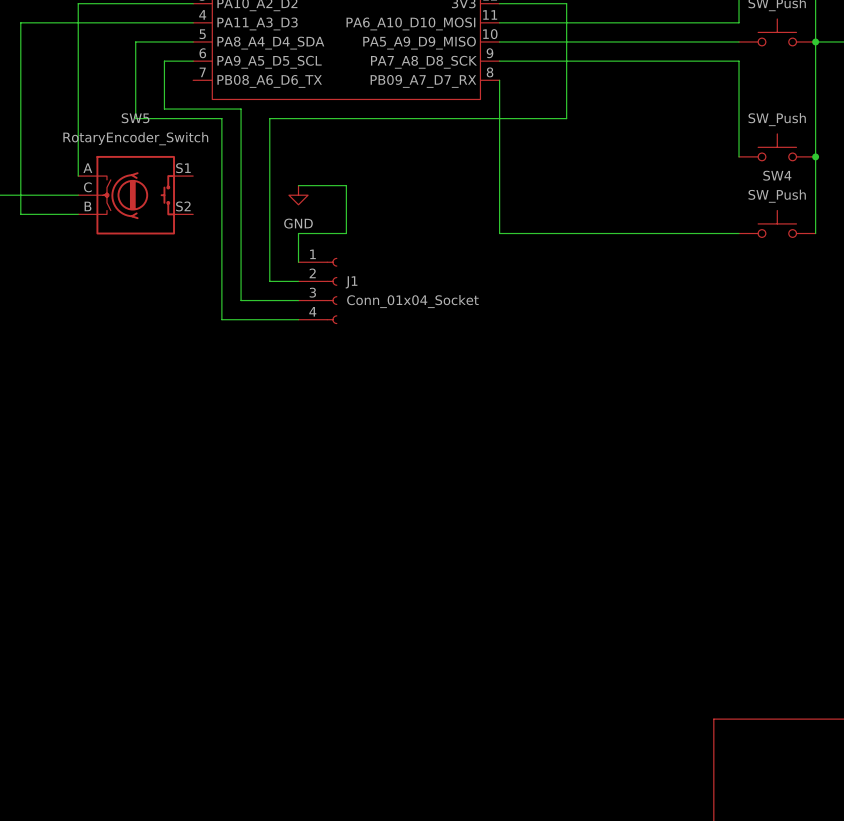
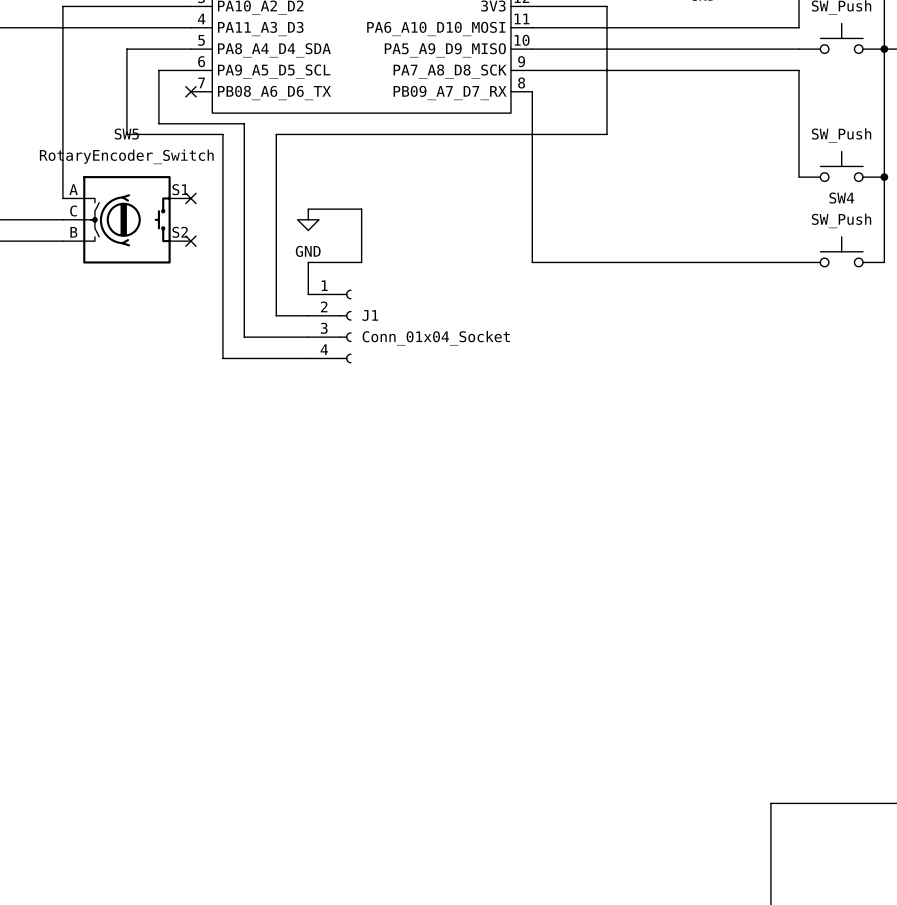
no-connect mark: none -> (190, 91)
no-connect mark: none -> (190, 198)
no-connect mark: none -> (190, 241)

